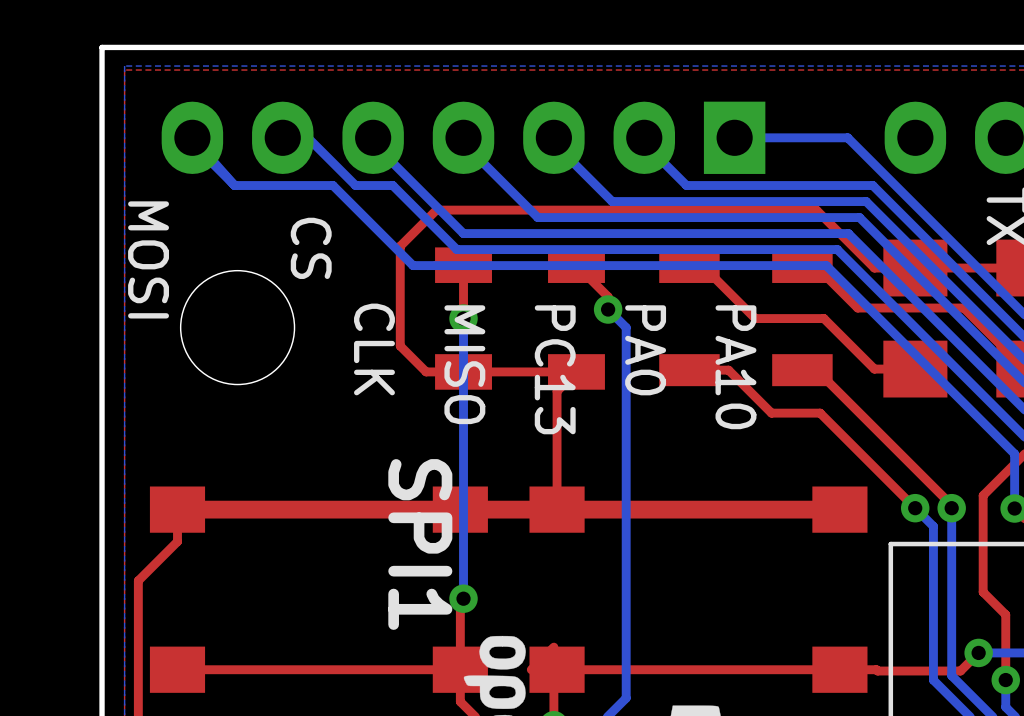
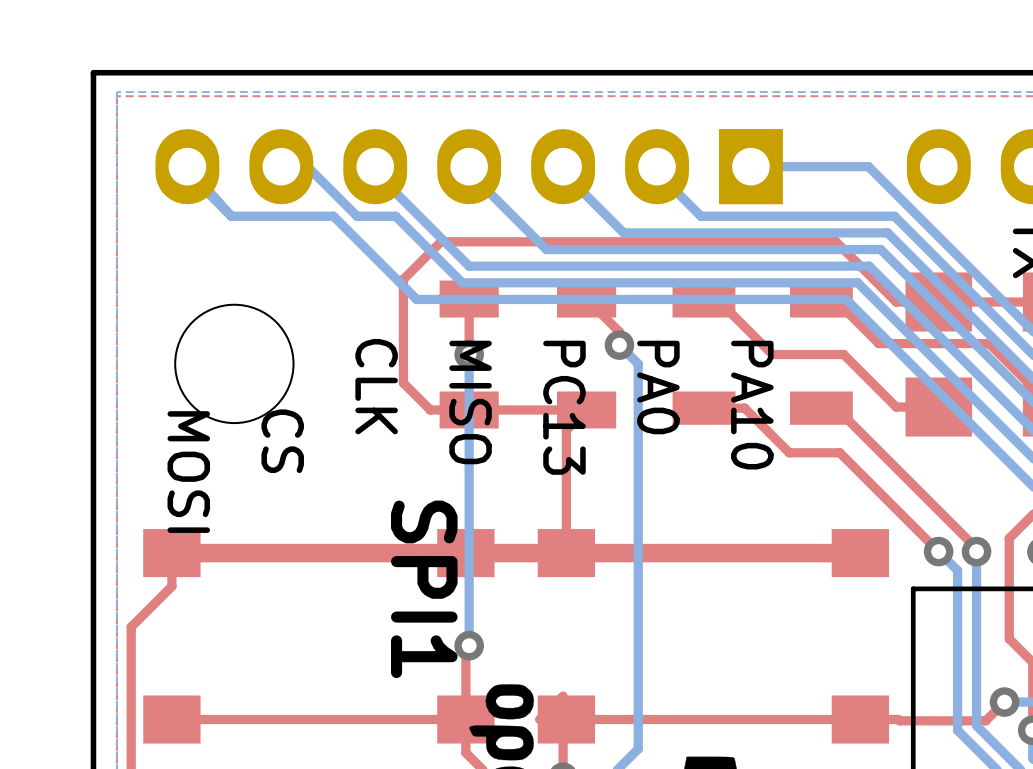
text position: CS (311, 248) -> CS (282, 441)
text position: MOSI (148, 259) -> MOSI (188, 472)

